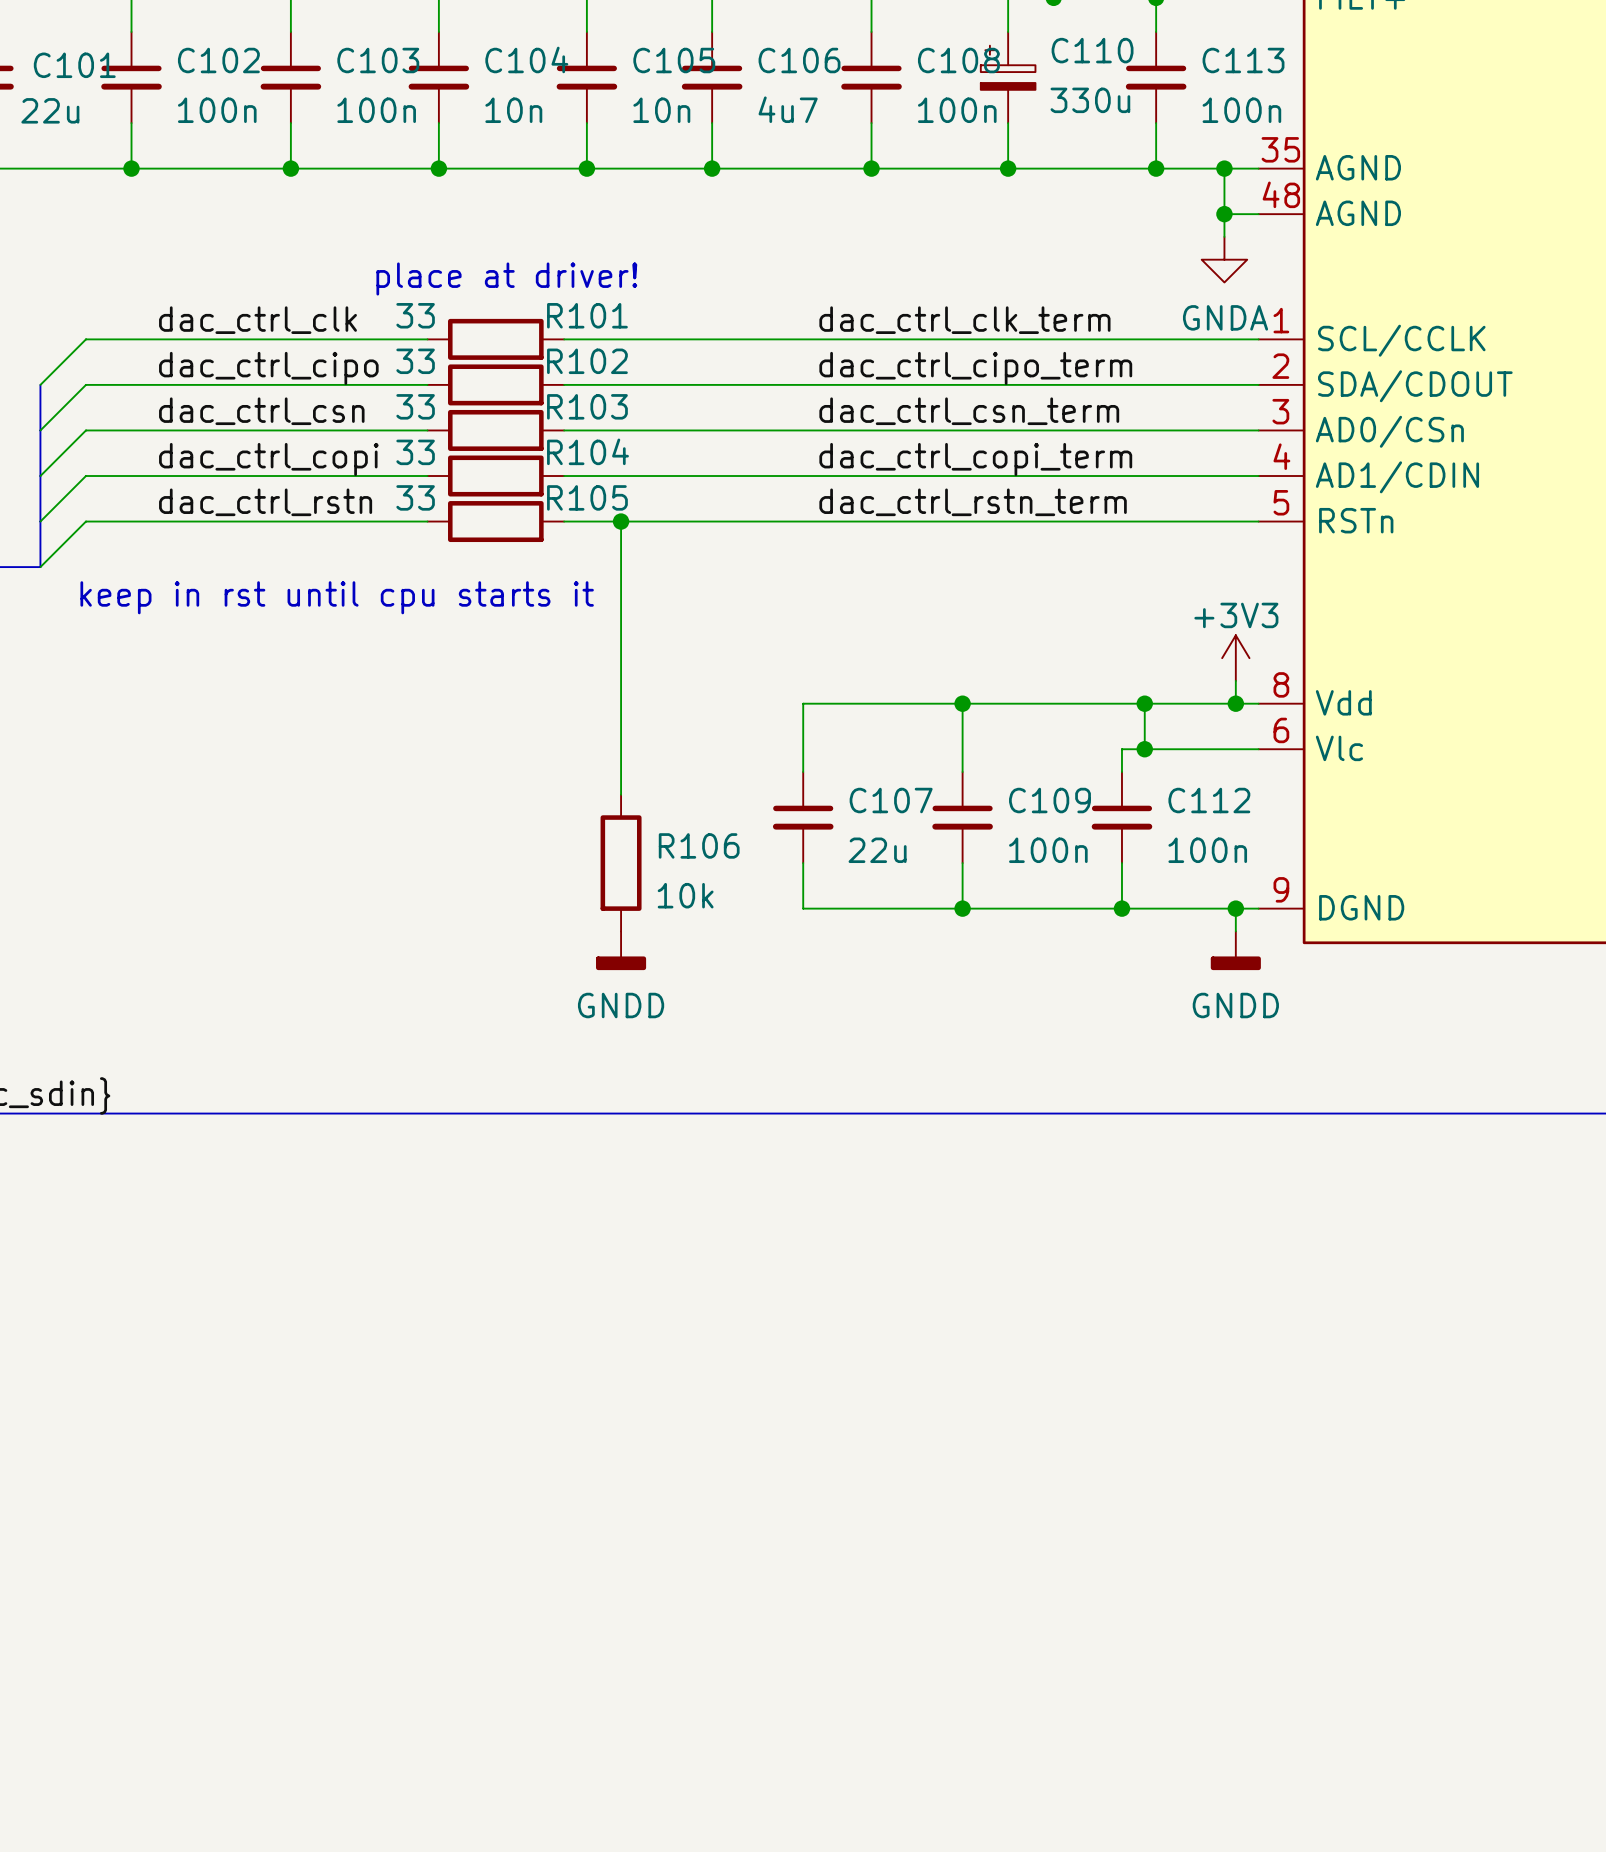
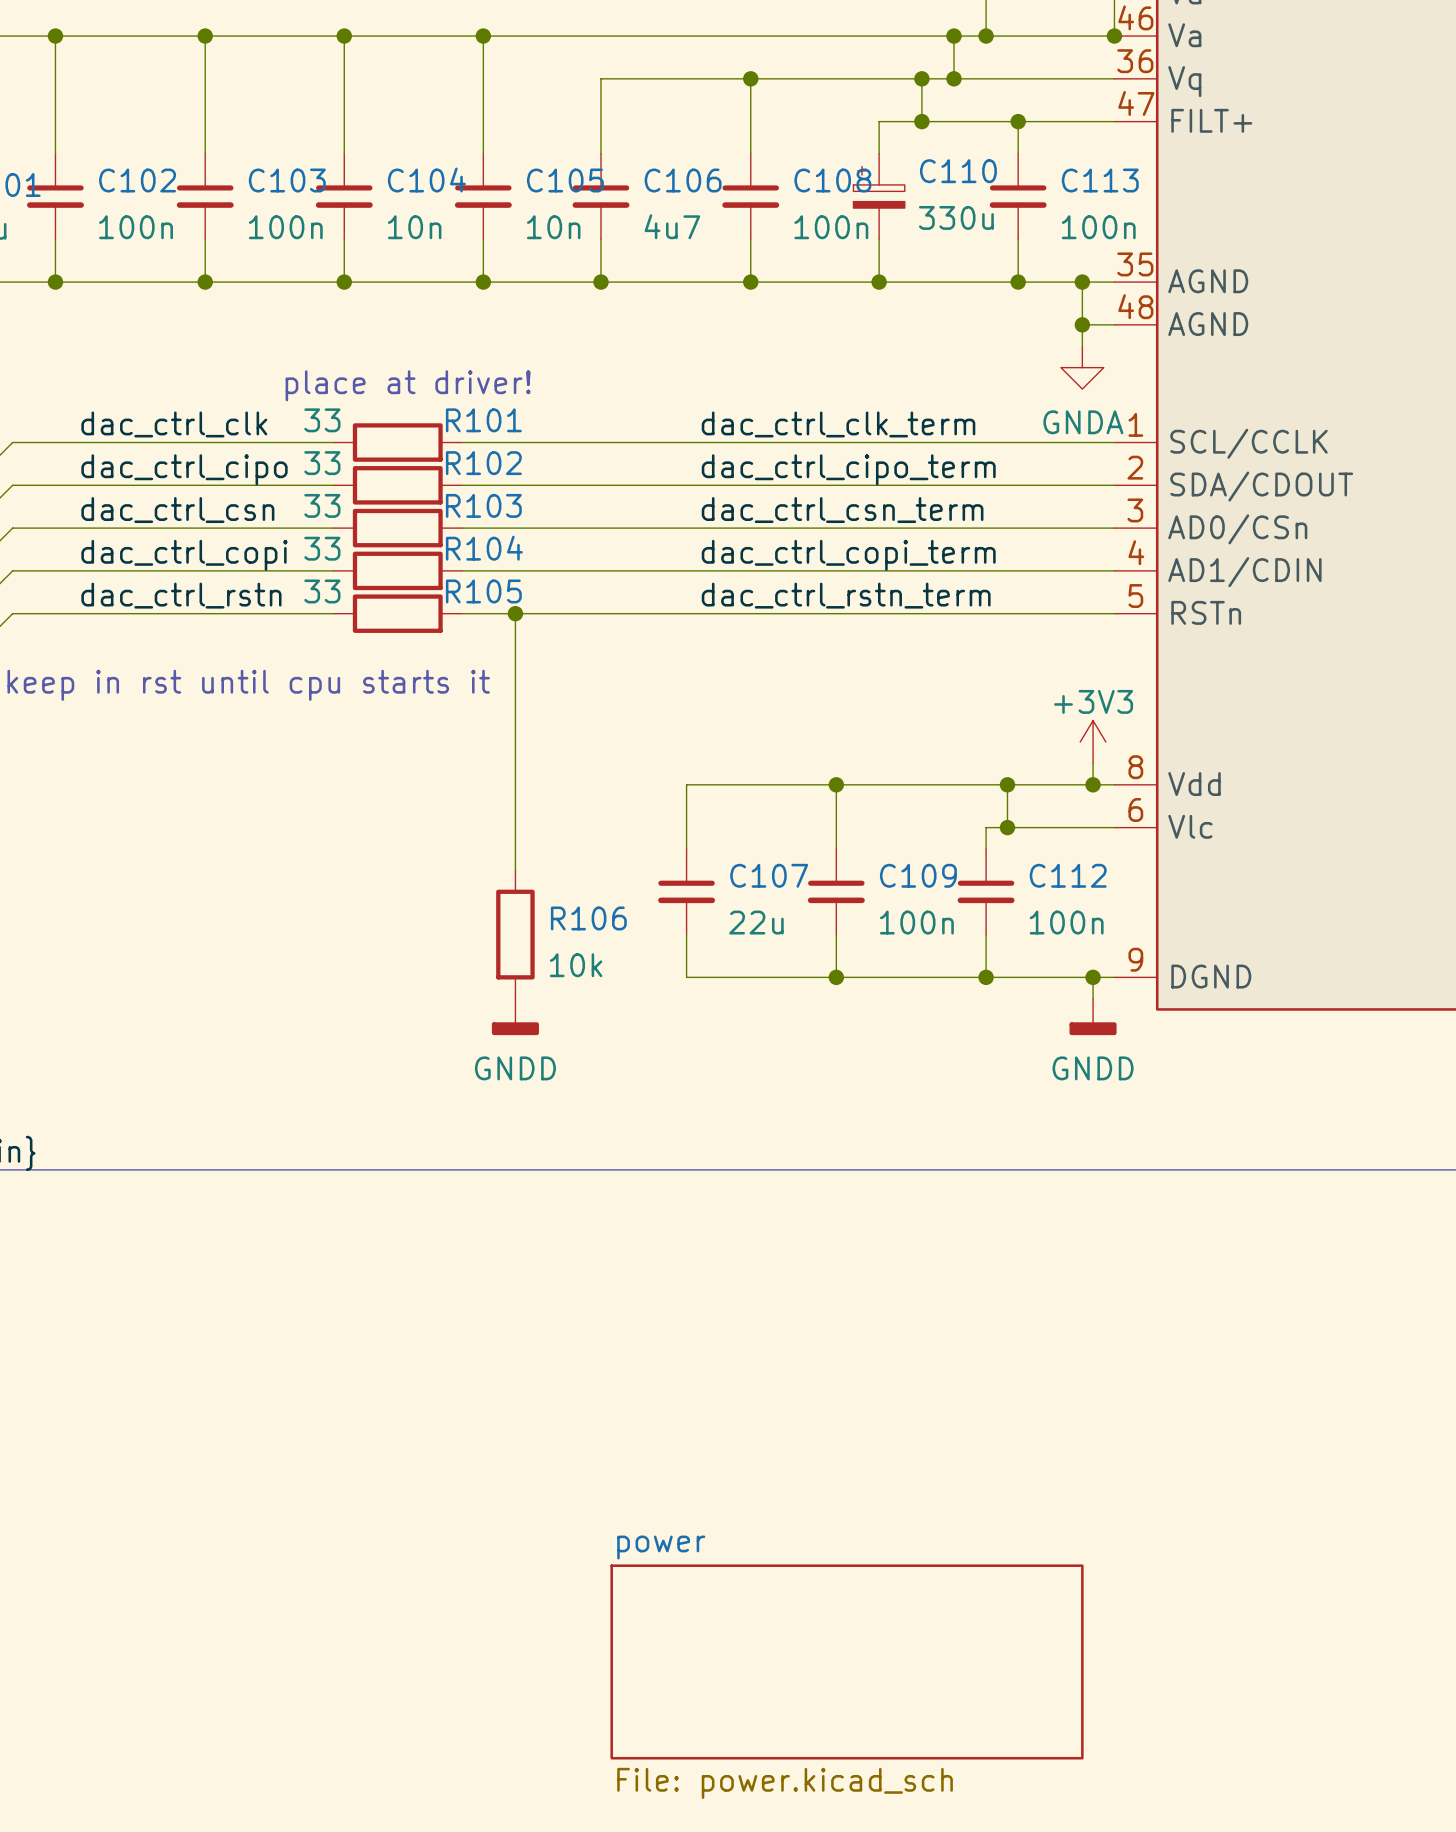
sheet power: none -> File: power.kicad_sch (847, 1661)

